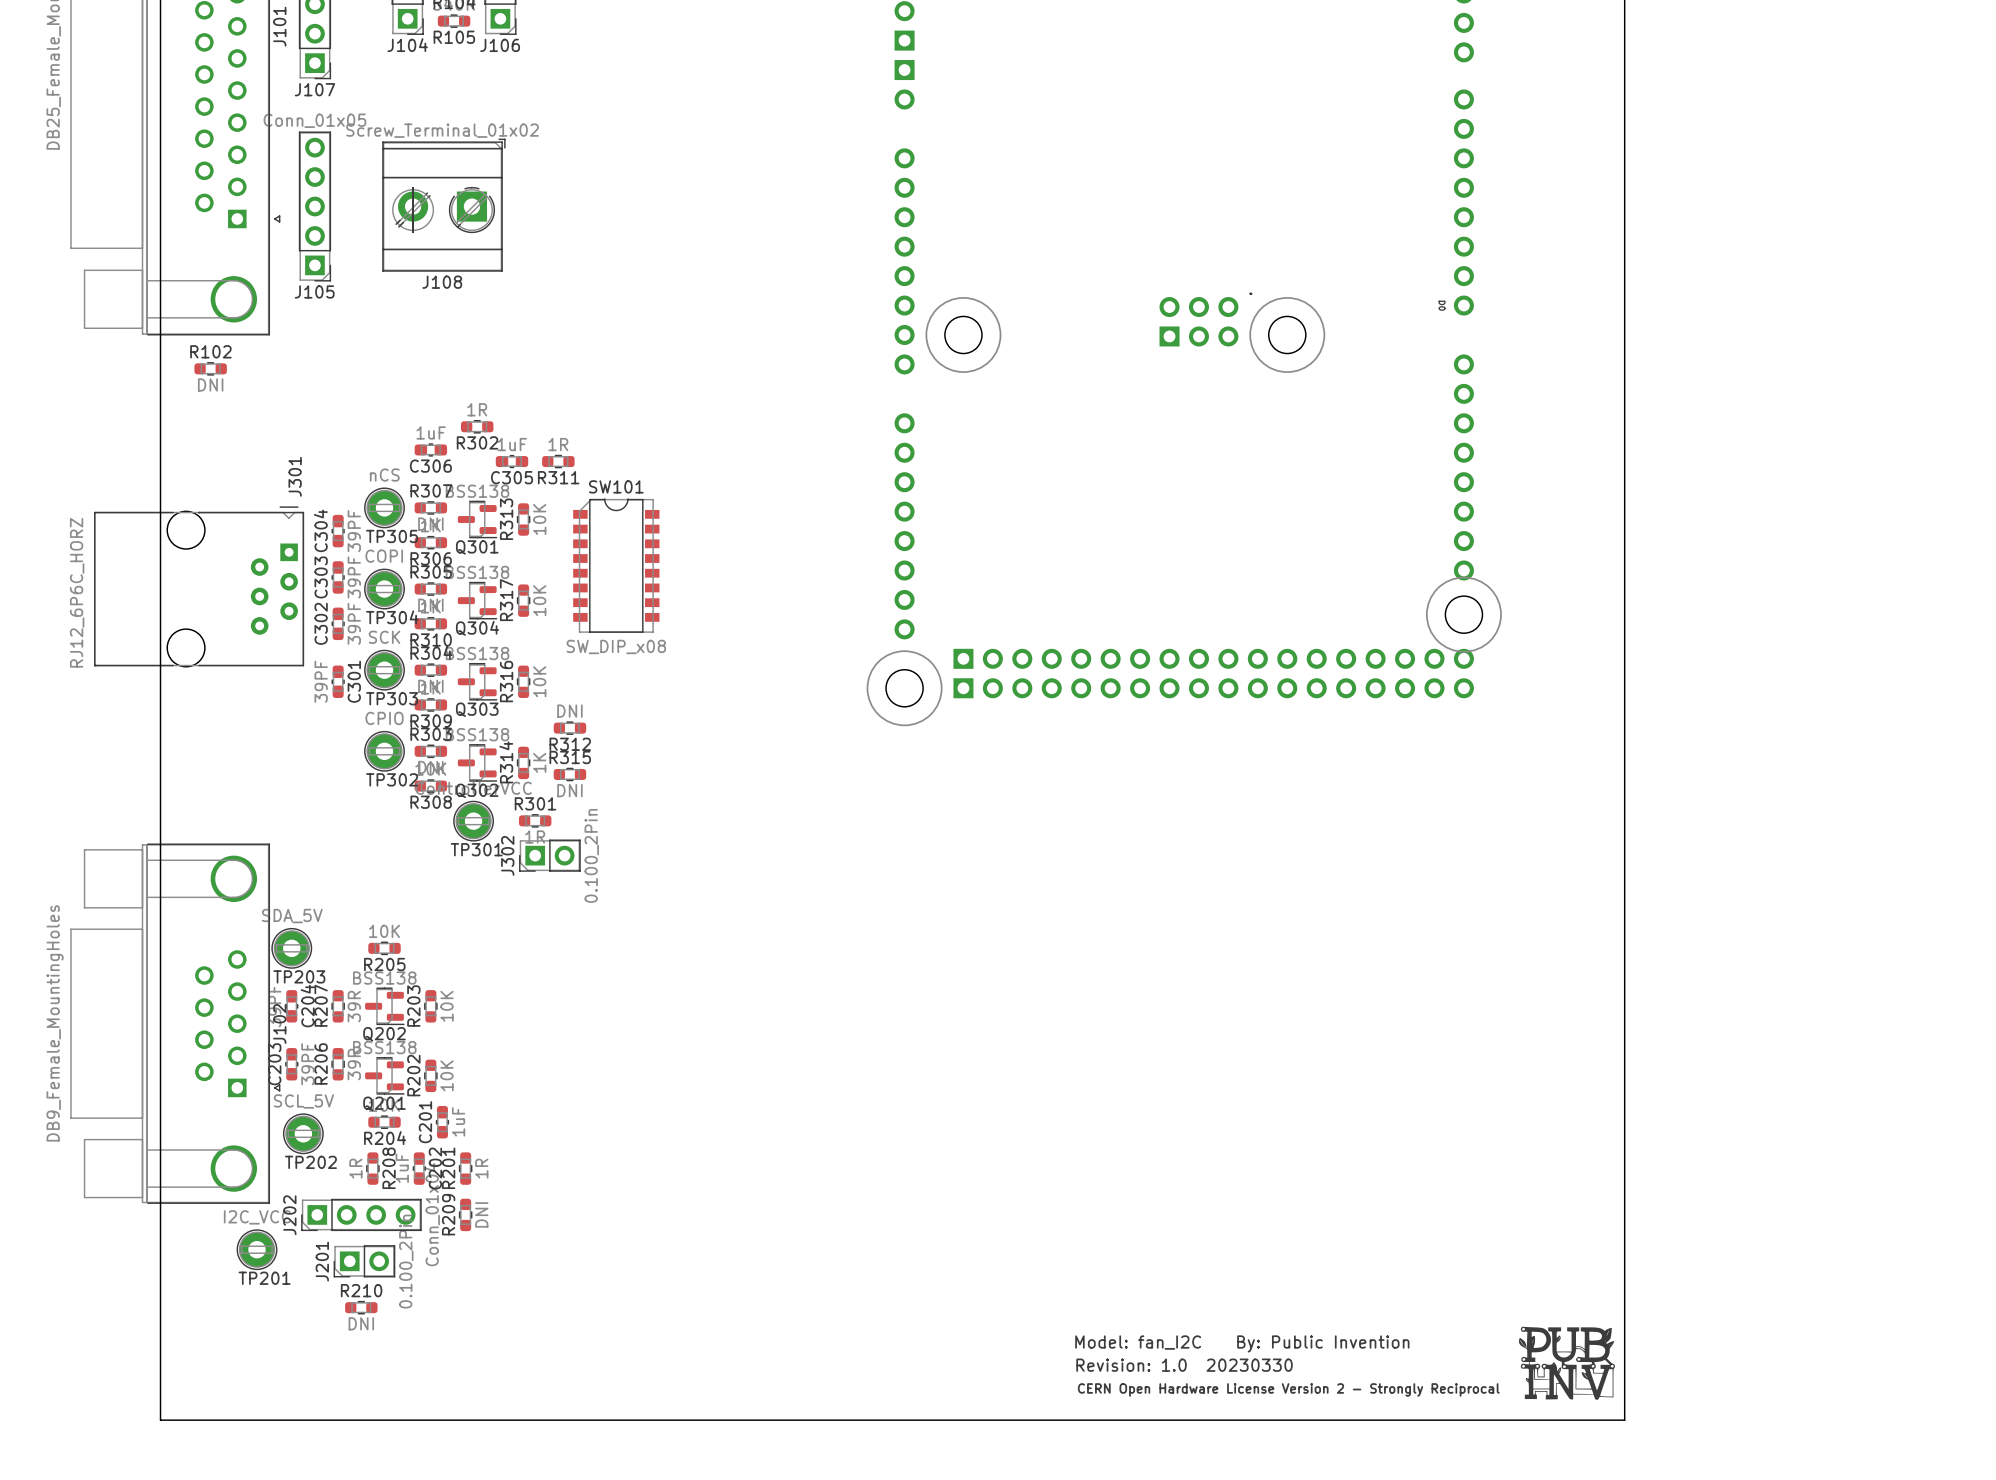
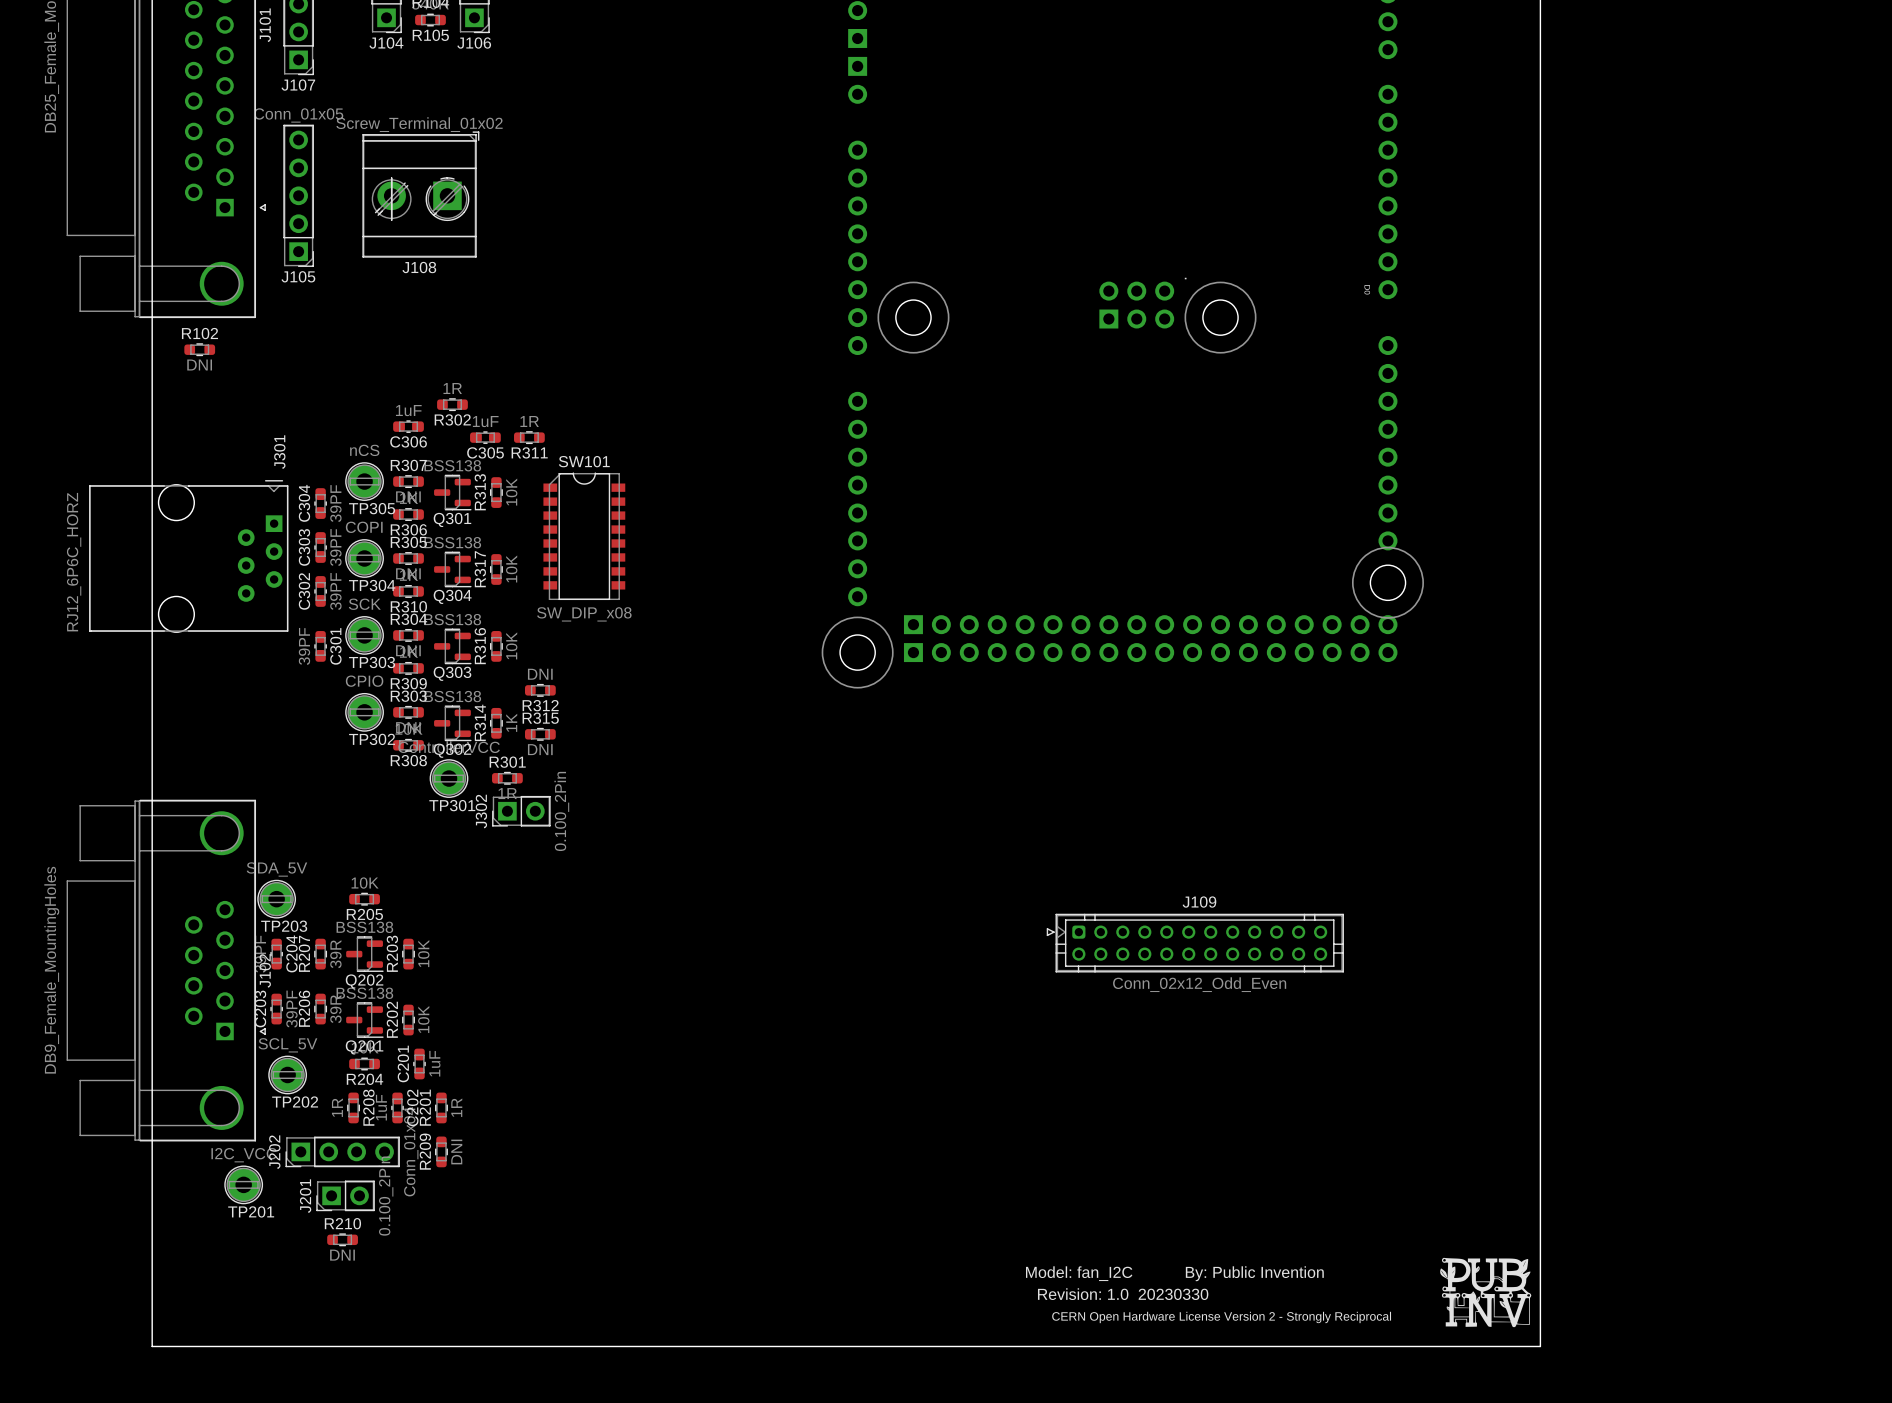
J109: none -> Conn_02x12_Odd_Even (1195, 943)

